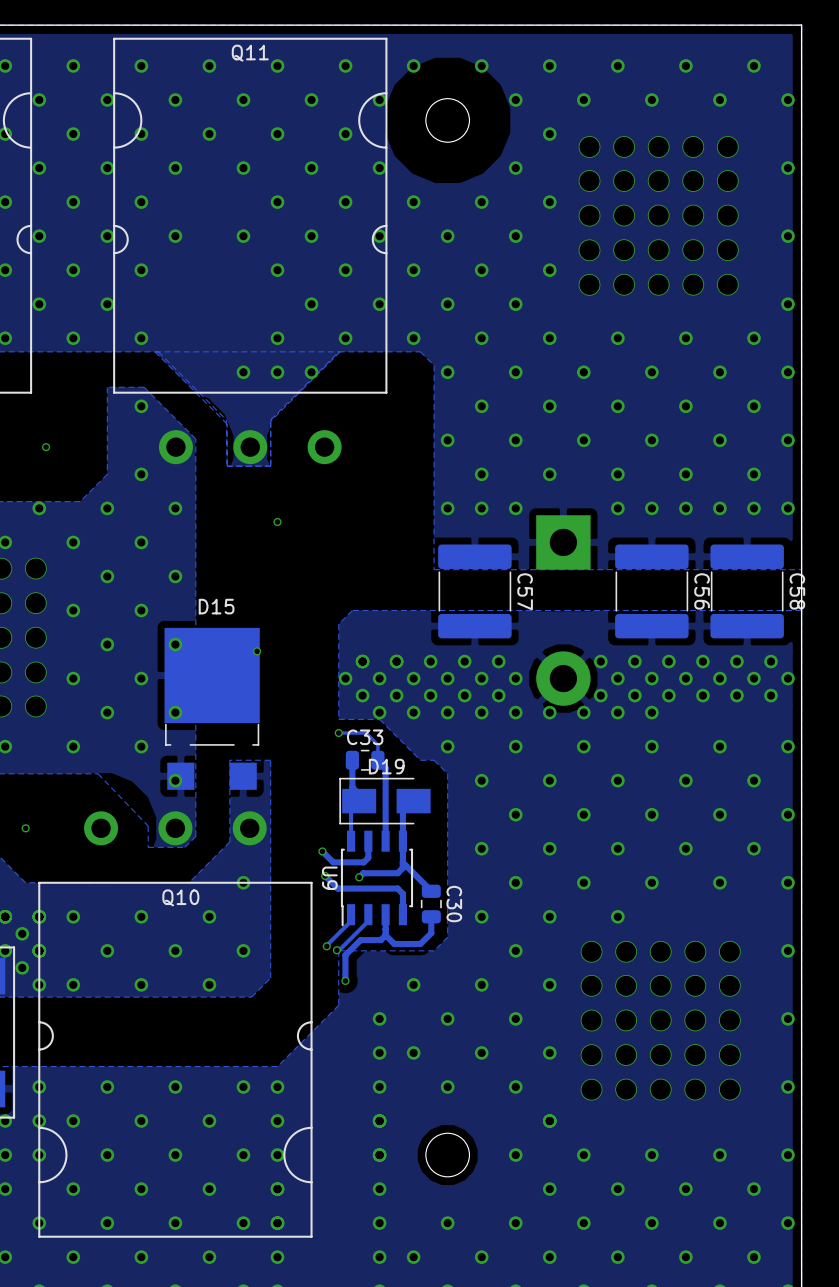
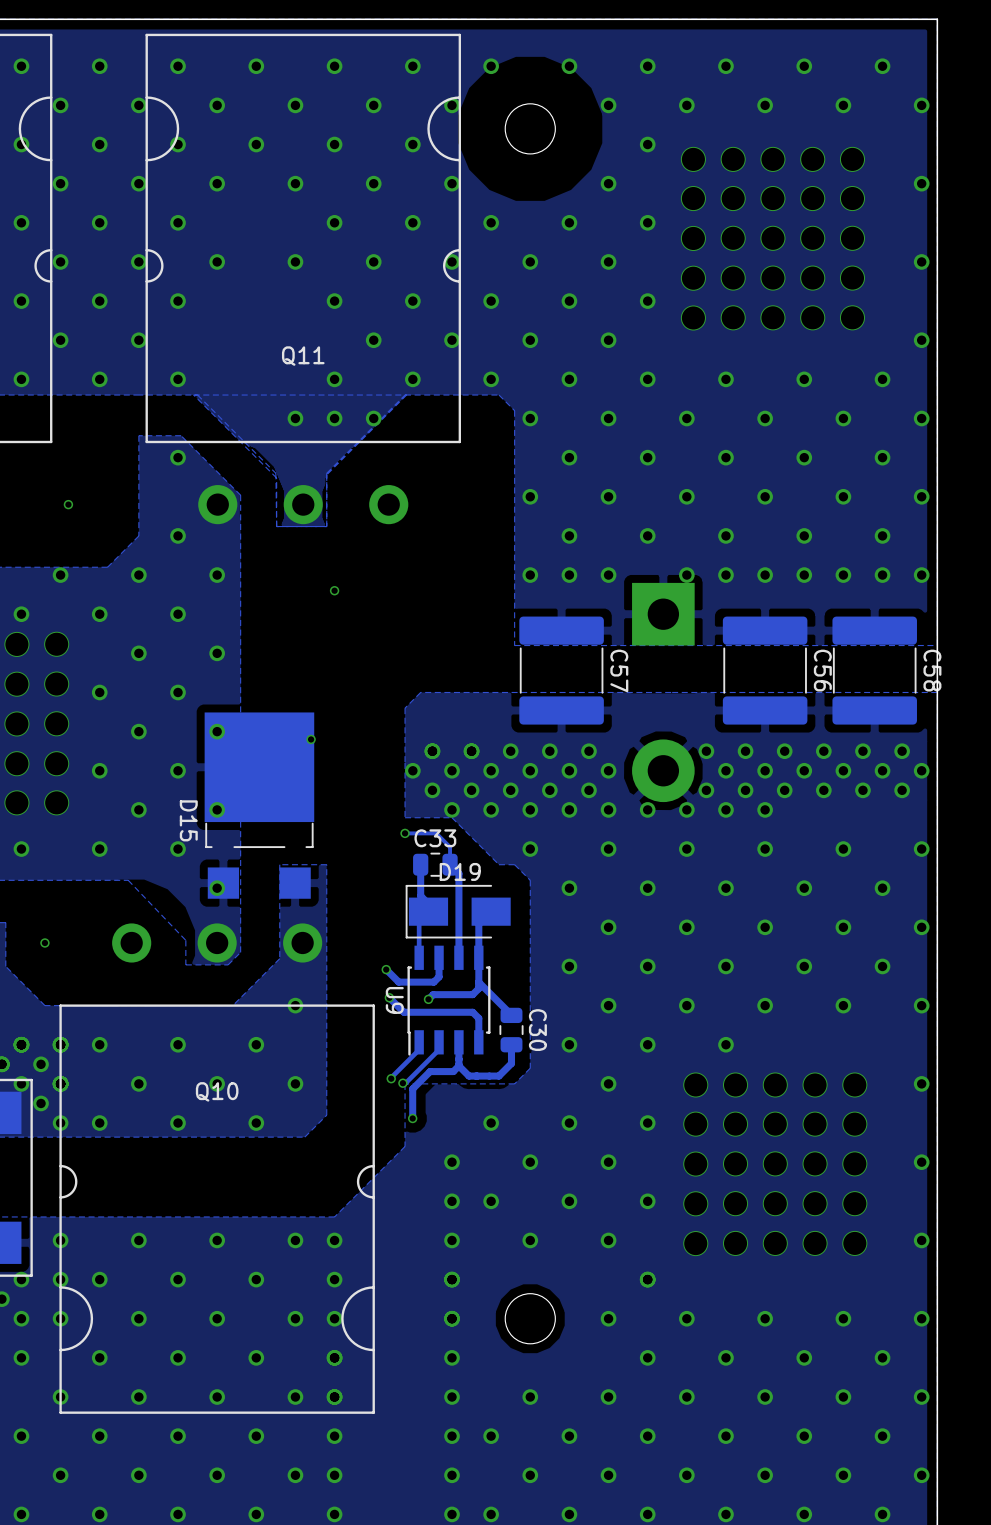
Q11 name position: Q11 (250, 53) -> Q11 (303, 356)
via: none -> (686, 575)
D15 name rotation: 0° (216, 606) -> 90° clockwise (188, 820)
D15 name position: D15 (216, 606) -> D15 (188, 820)
Q10 name position: Q10 (180, 897) -> Q10 (217, 1091)

